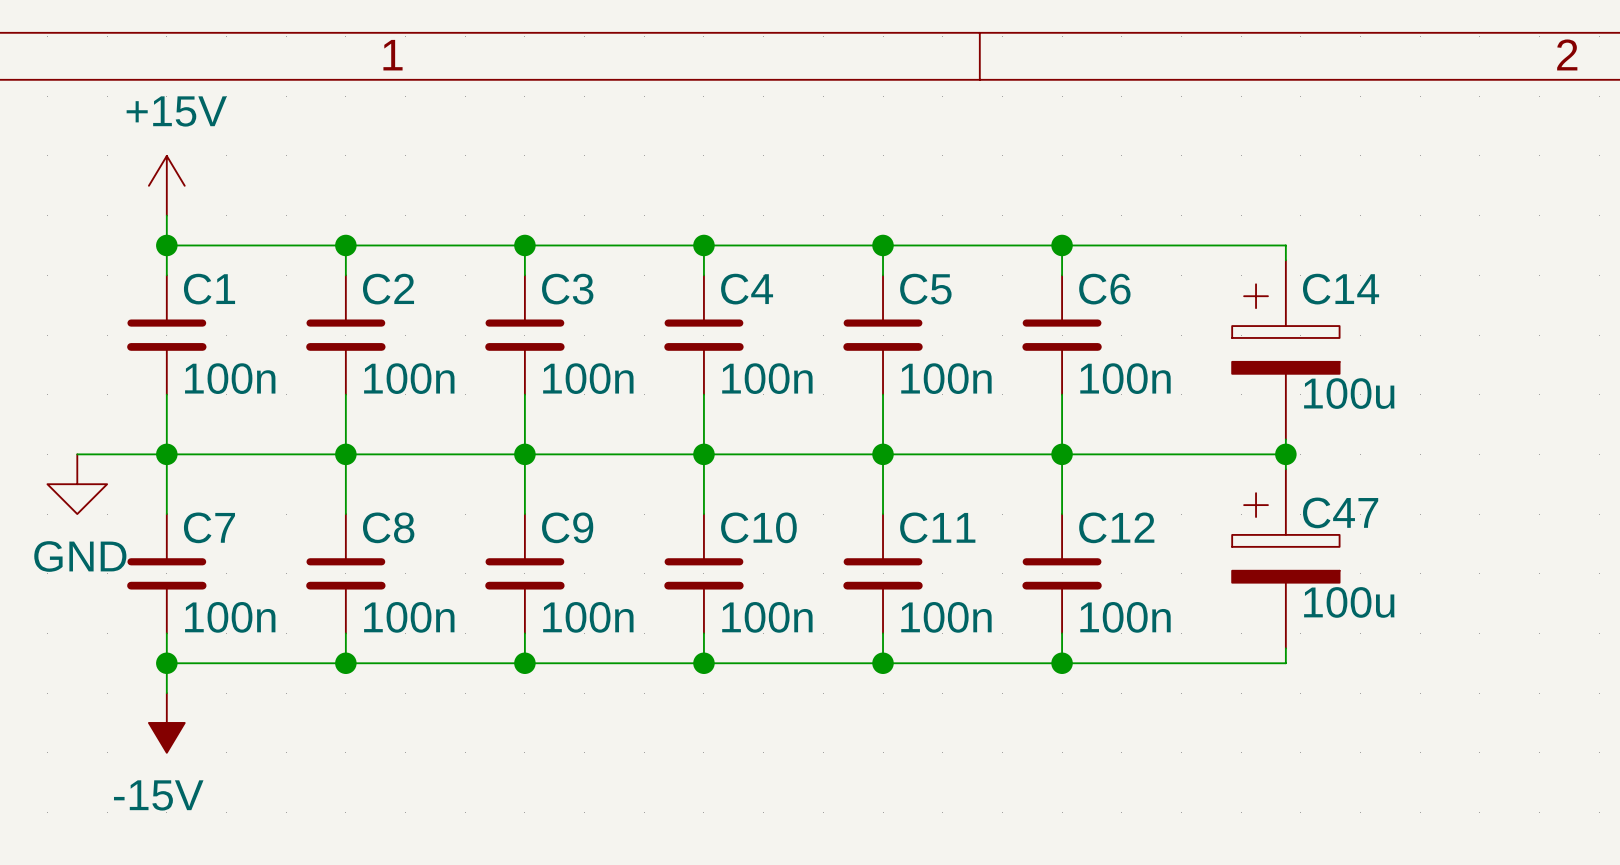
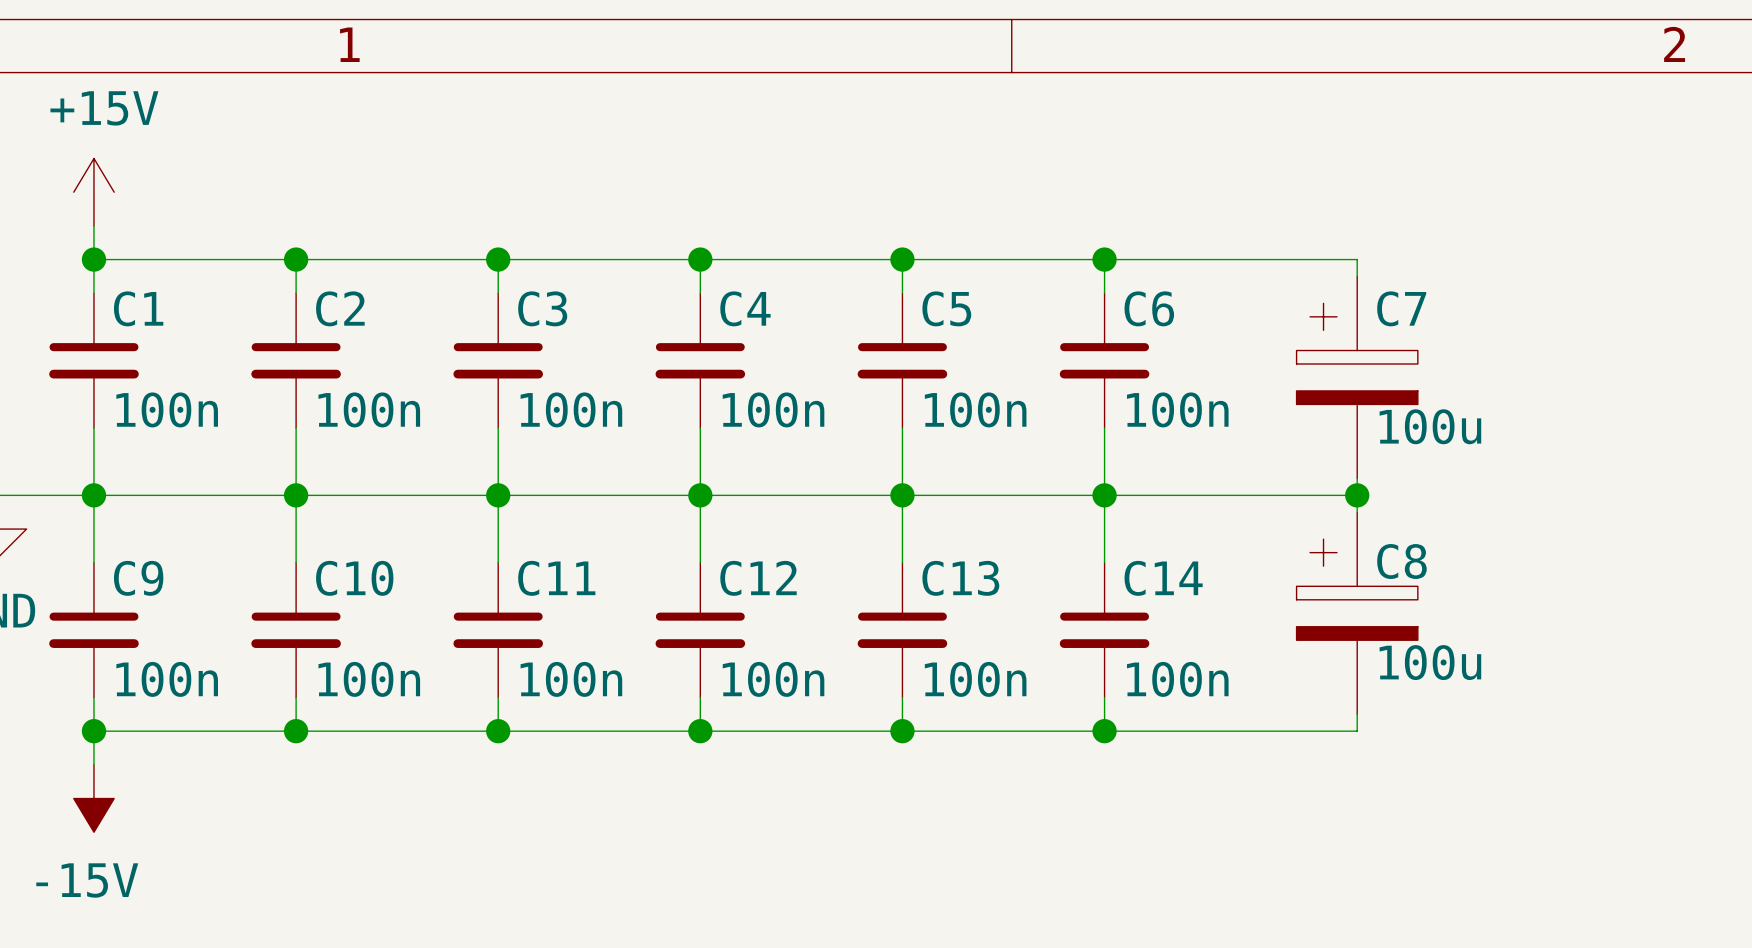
C14 name: C14 (1341, 289) -> C7 (1401, 308)
C47 name: C47 (1340, 512) -> C8 (1401, 561)
C7 name: C7 (209, 527) -> C9 (138, 578)
C8 name: C8 (388, 527) -> C10 (354, 578)
C9 name: C9 (567, 527) -> C11 (556, 578)
C10 name: C10 (758, 527) -> C12 (758, 578)
C11 name: C11 (937, 527) -> C13 (960, 578)
C12 name: C12 (1116, 527) -> C14 (1163, 578)

